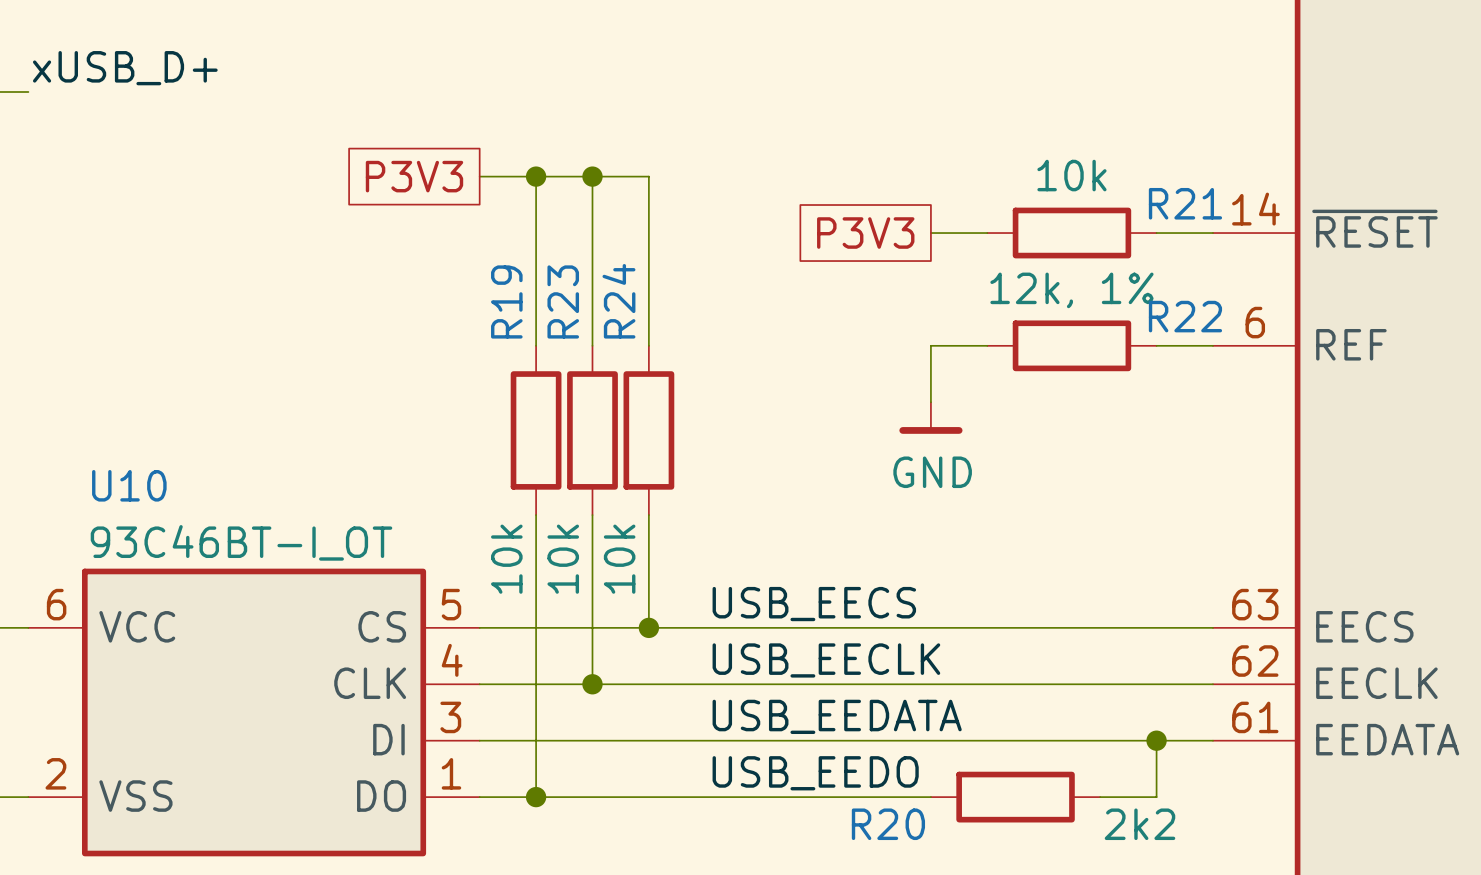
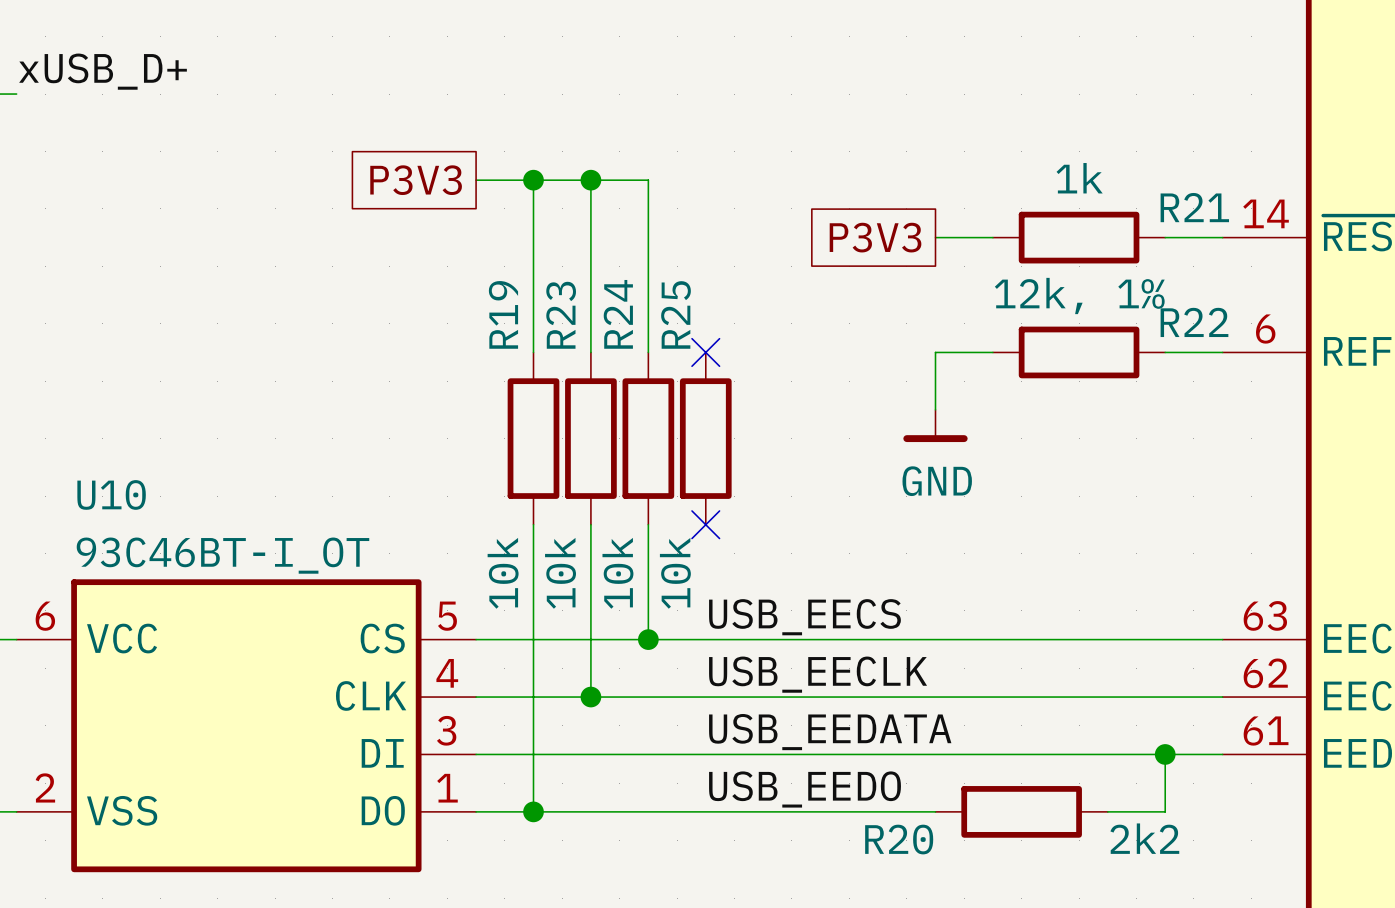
R21 value: 10k (1071, 175) -> 1k (1079, 178)
no-connect mark: none -> (705, 352)
R25: none -> 10k (705, 438)
no-connect mark: none -> (705, 524)

